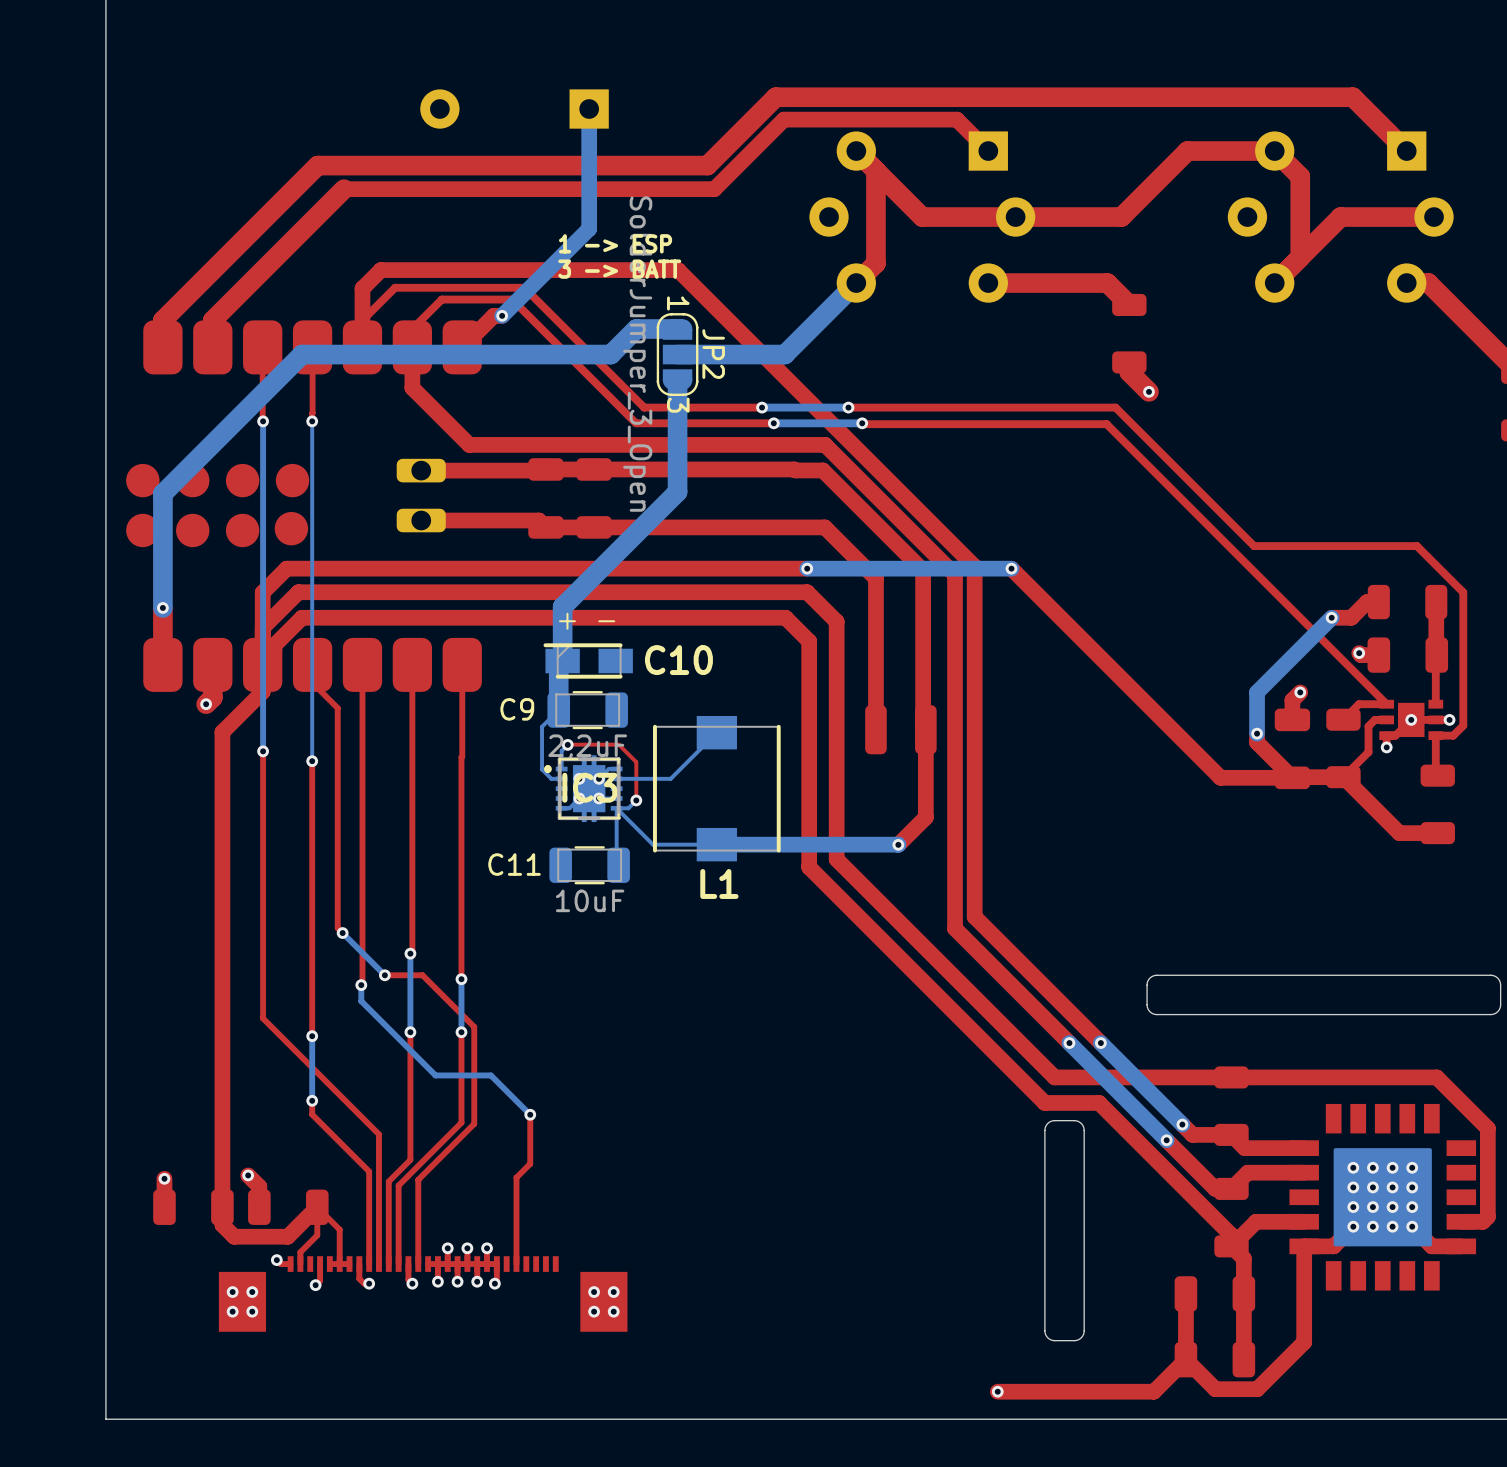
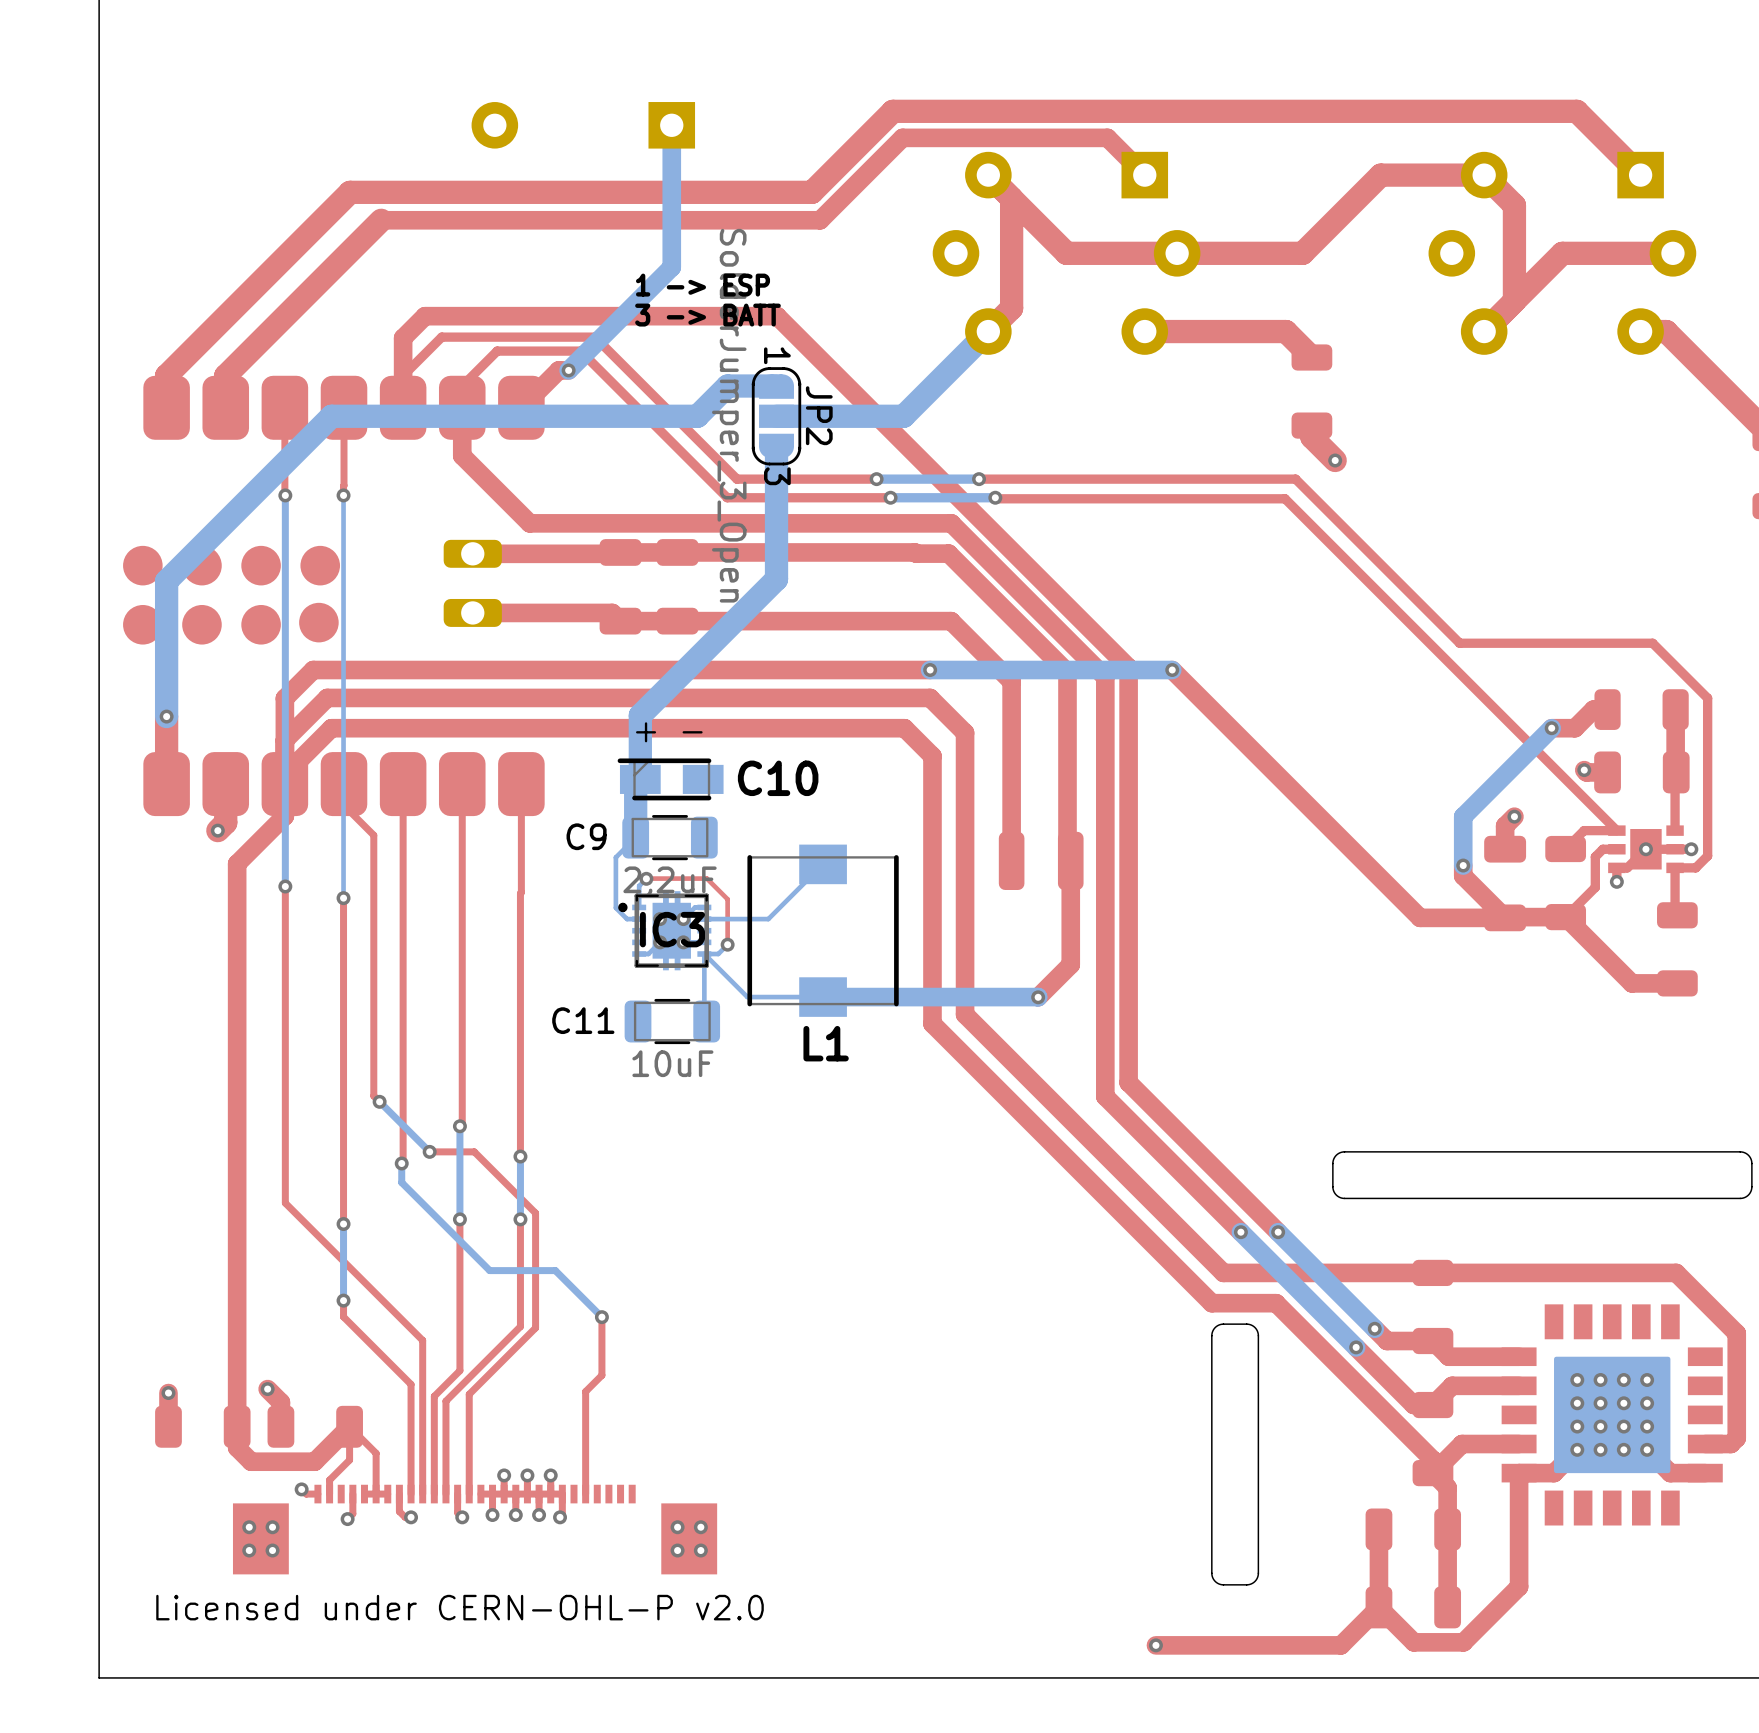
text: none -> Licensed under CERN-OHL-P v2.0 (460, 1607)

